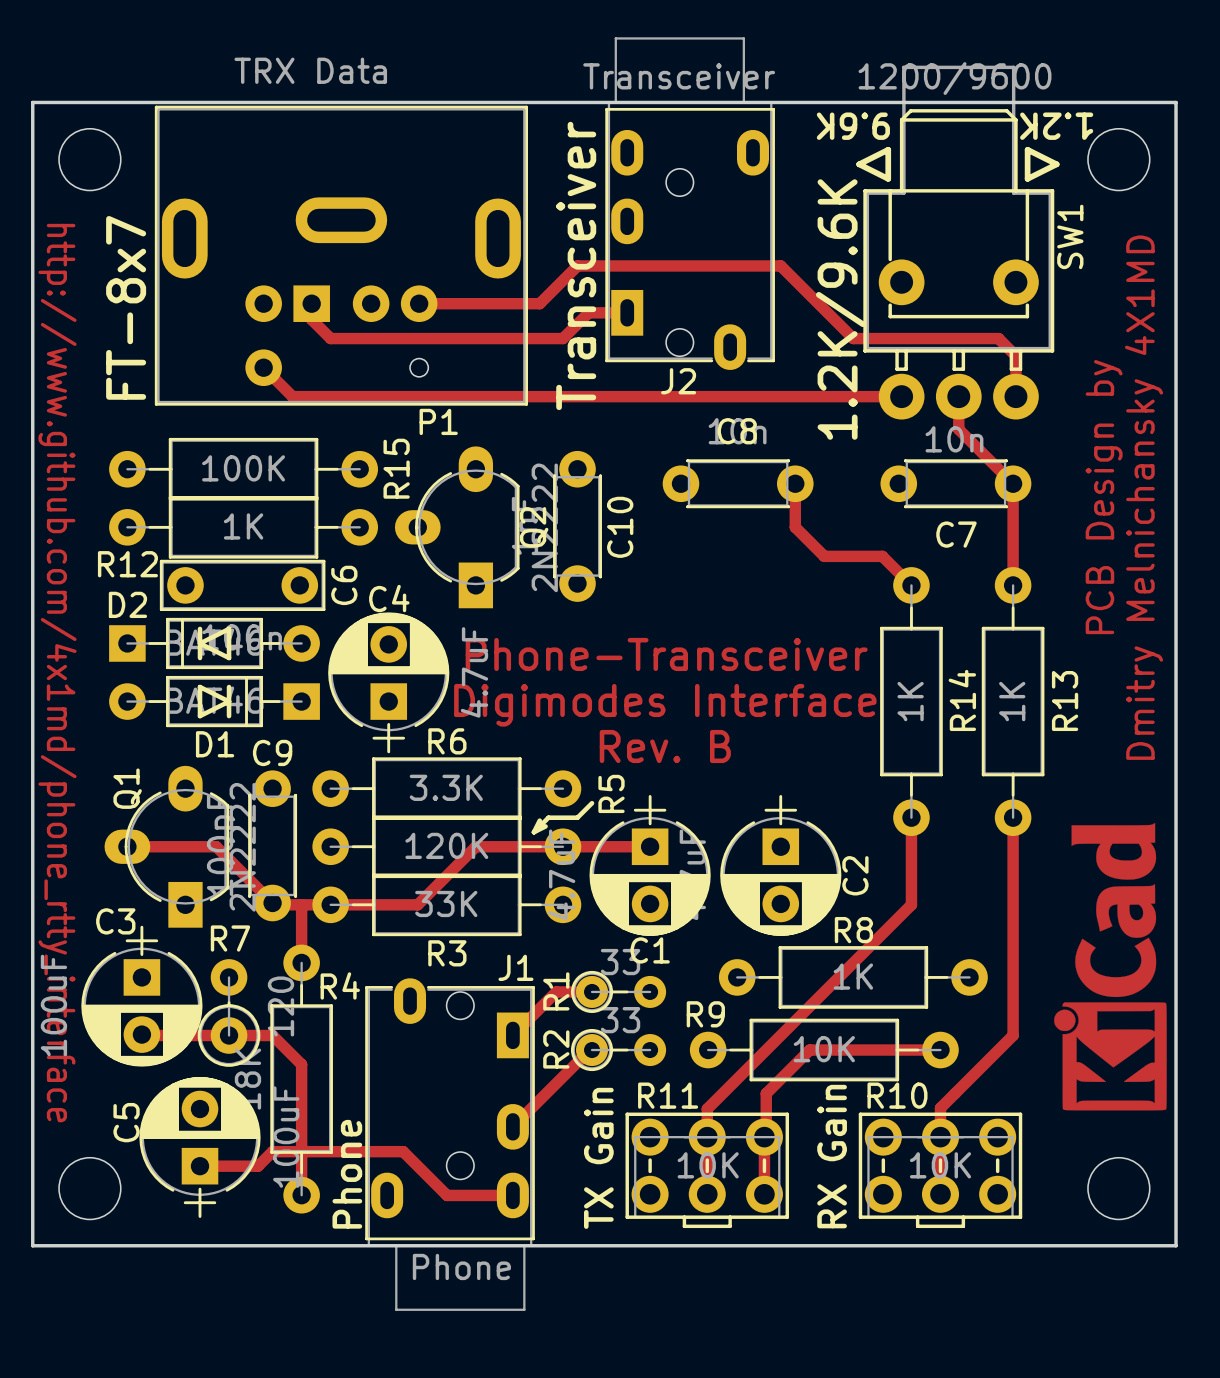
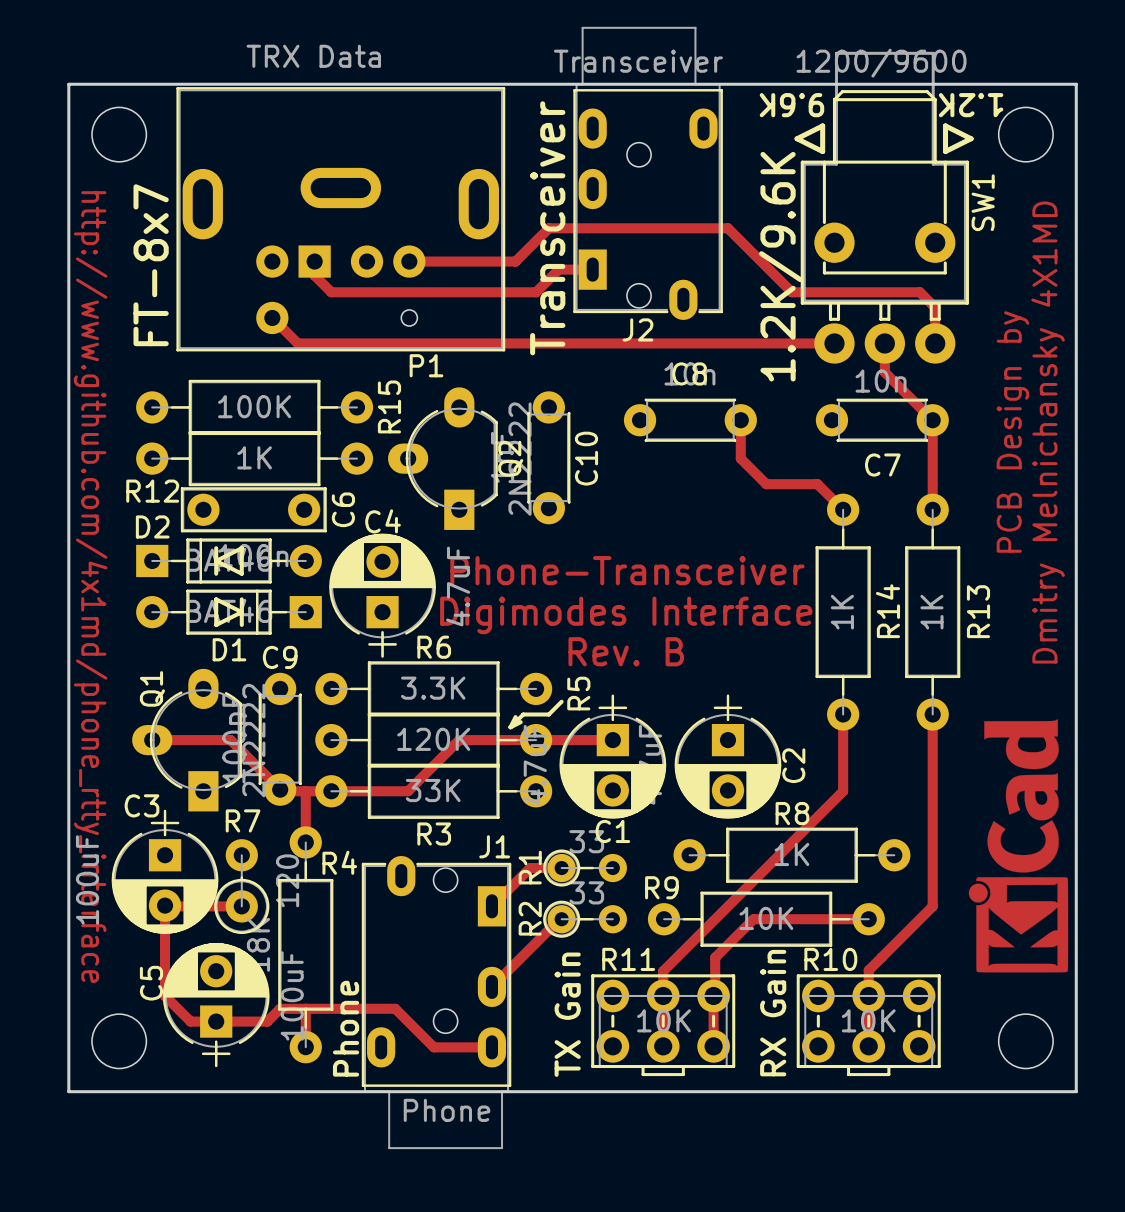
track: (229, 1035) (272, 1035) (301, 1064) (301, 1151) -> none
track: none -> (165, 907) (165, 995) (190, 1021) (216, 1021)

